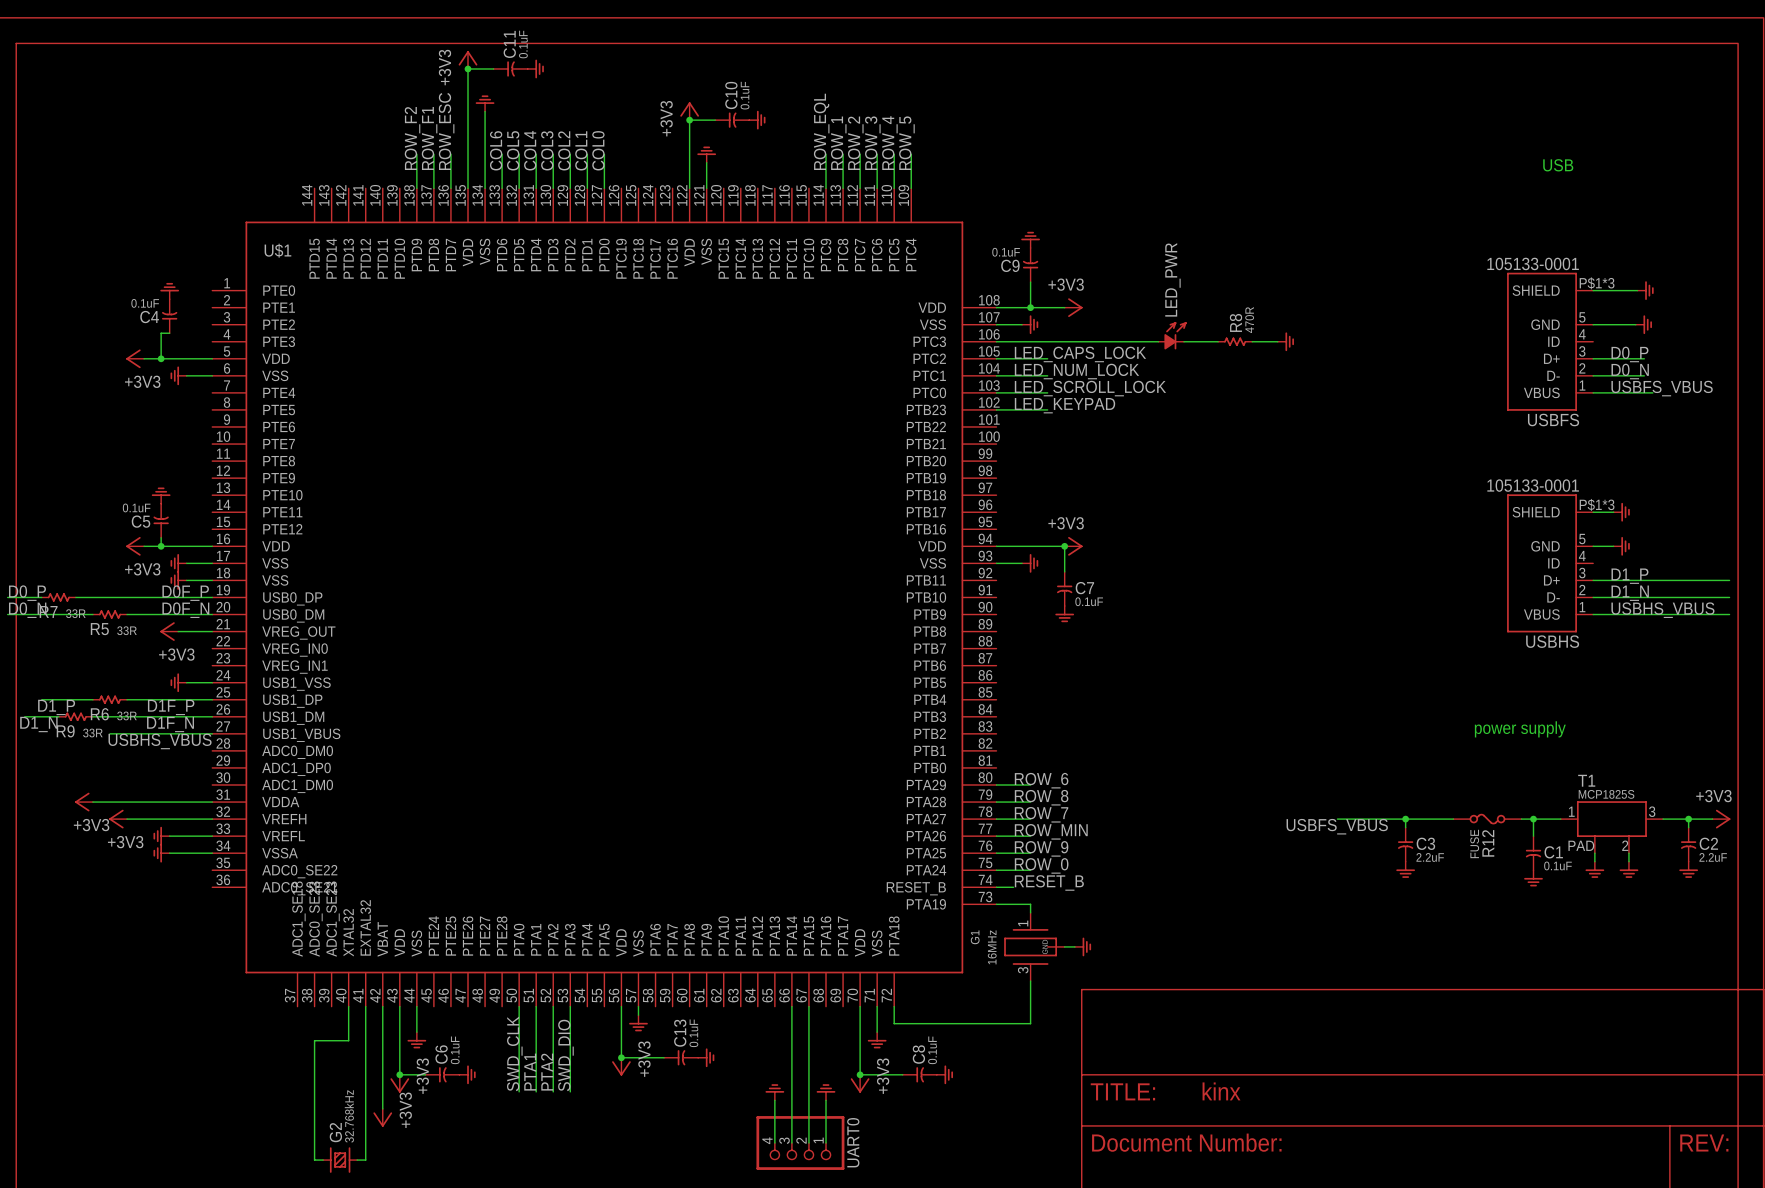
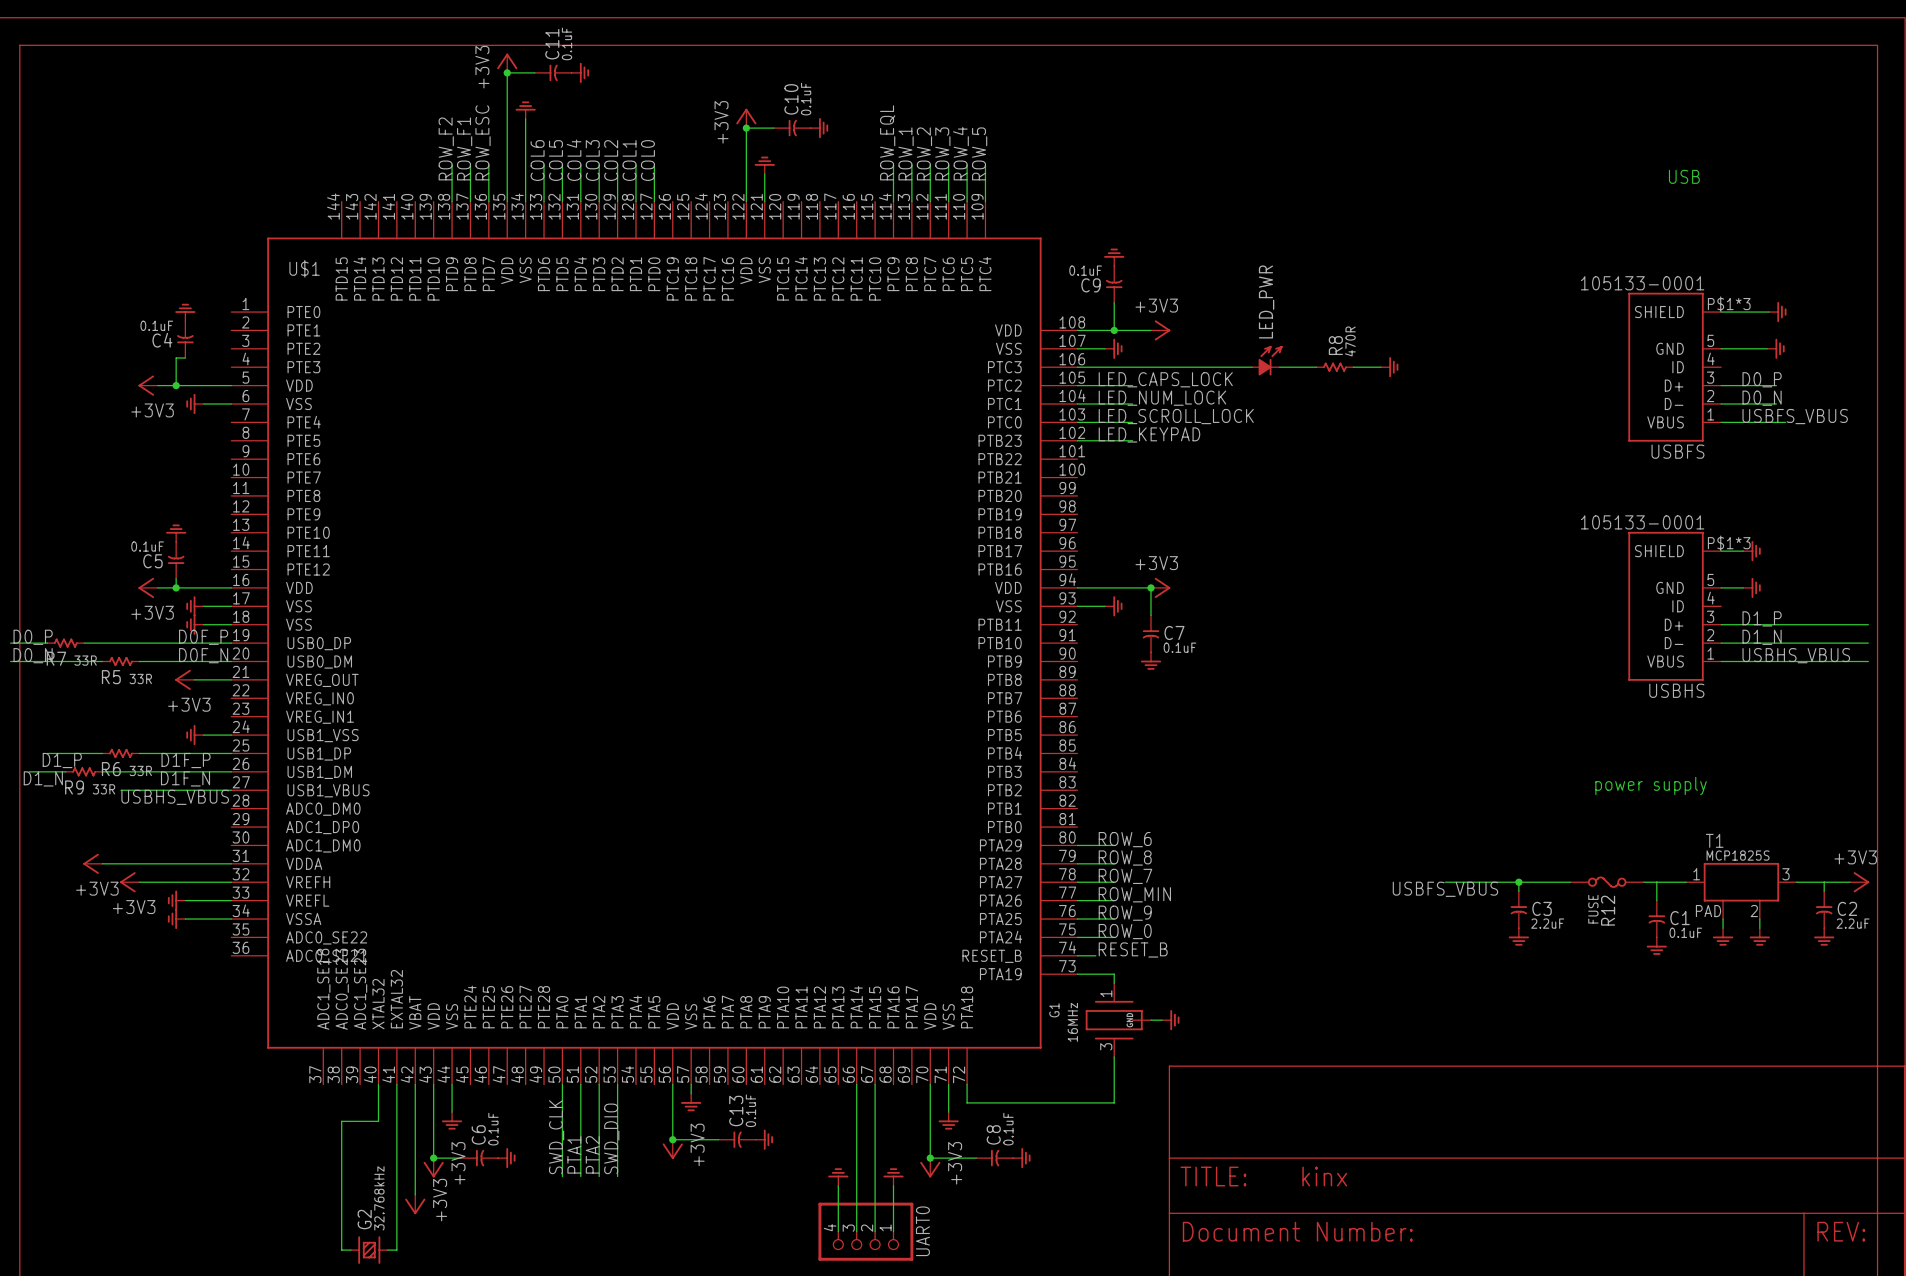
junction: (1533, 819) -> none
junction: (1688, 819) -> none

